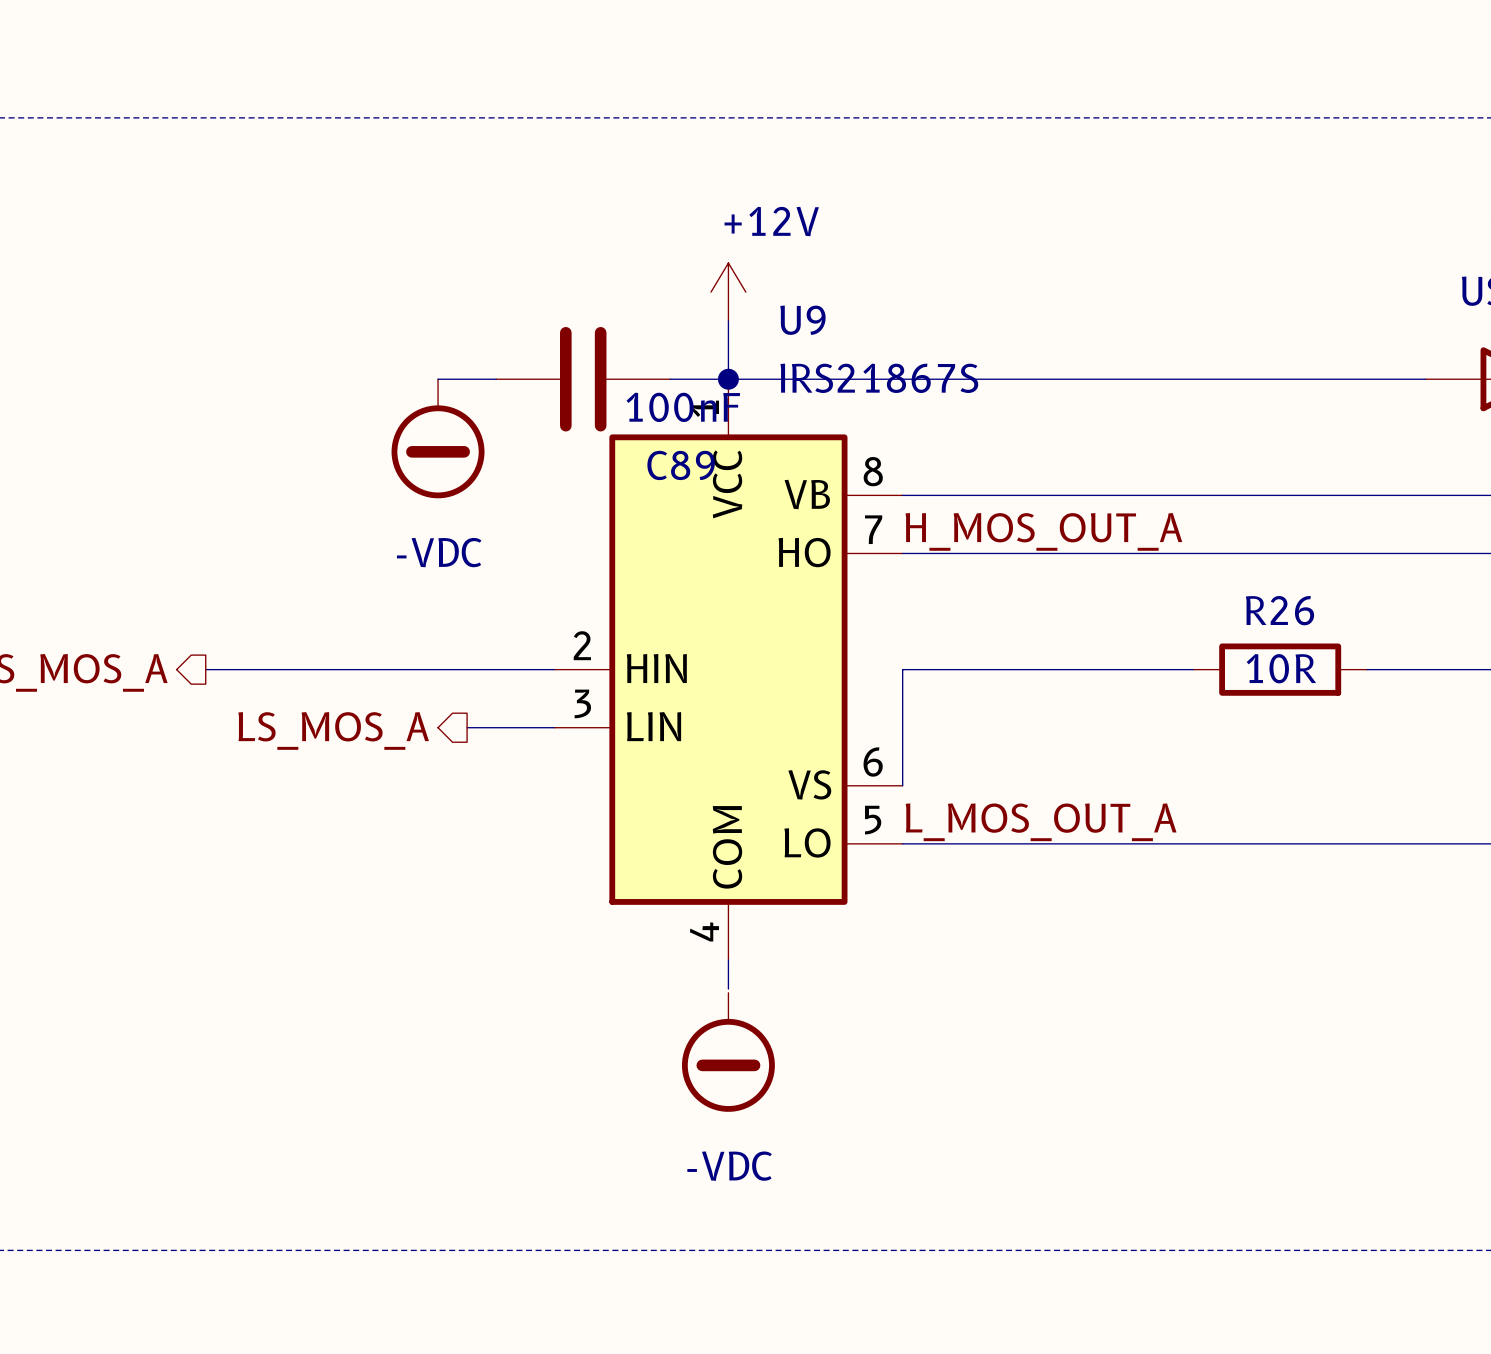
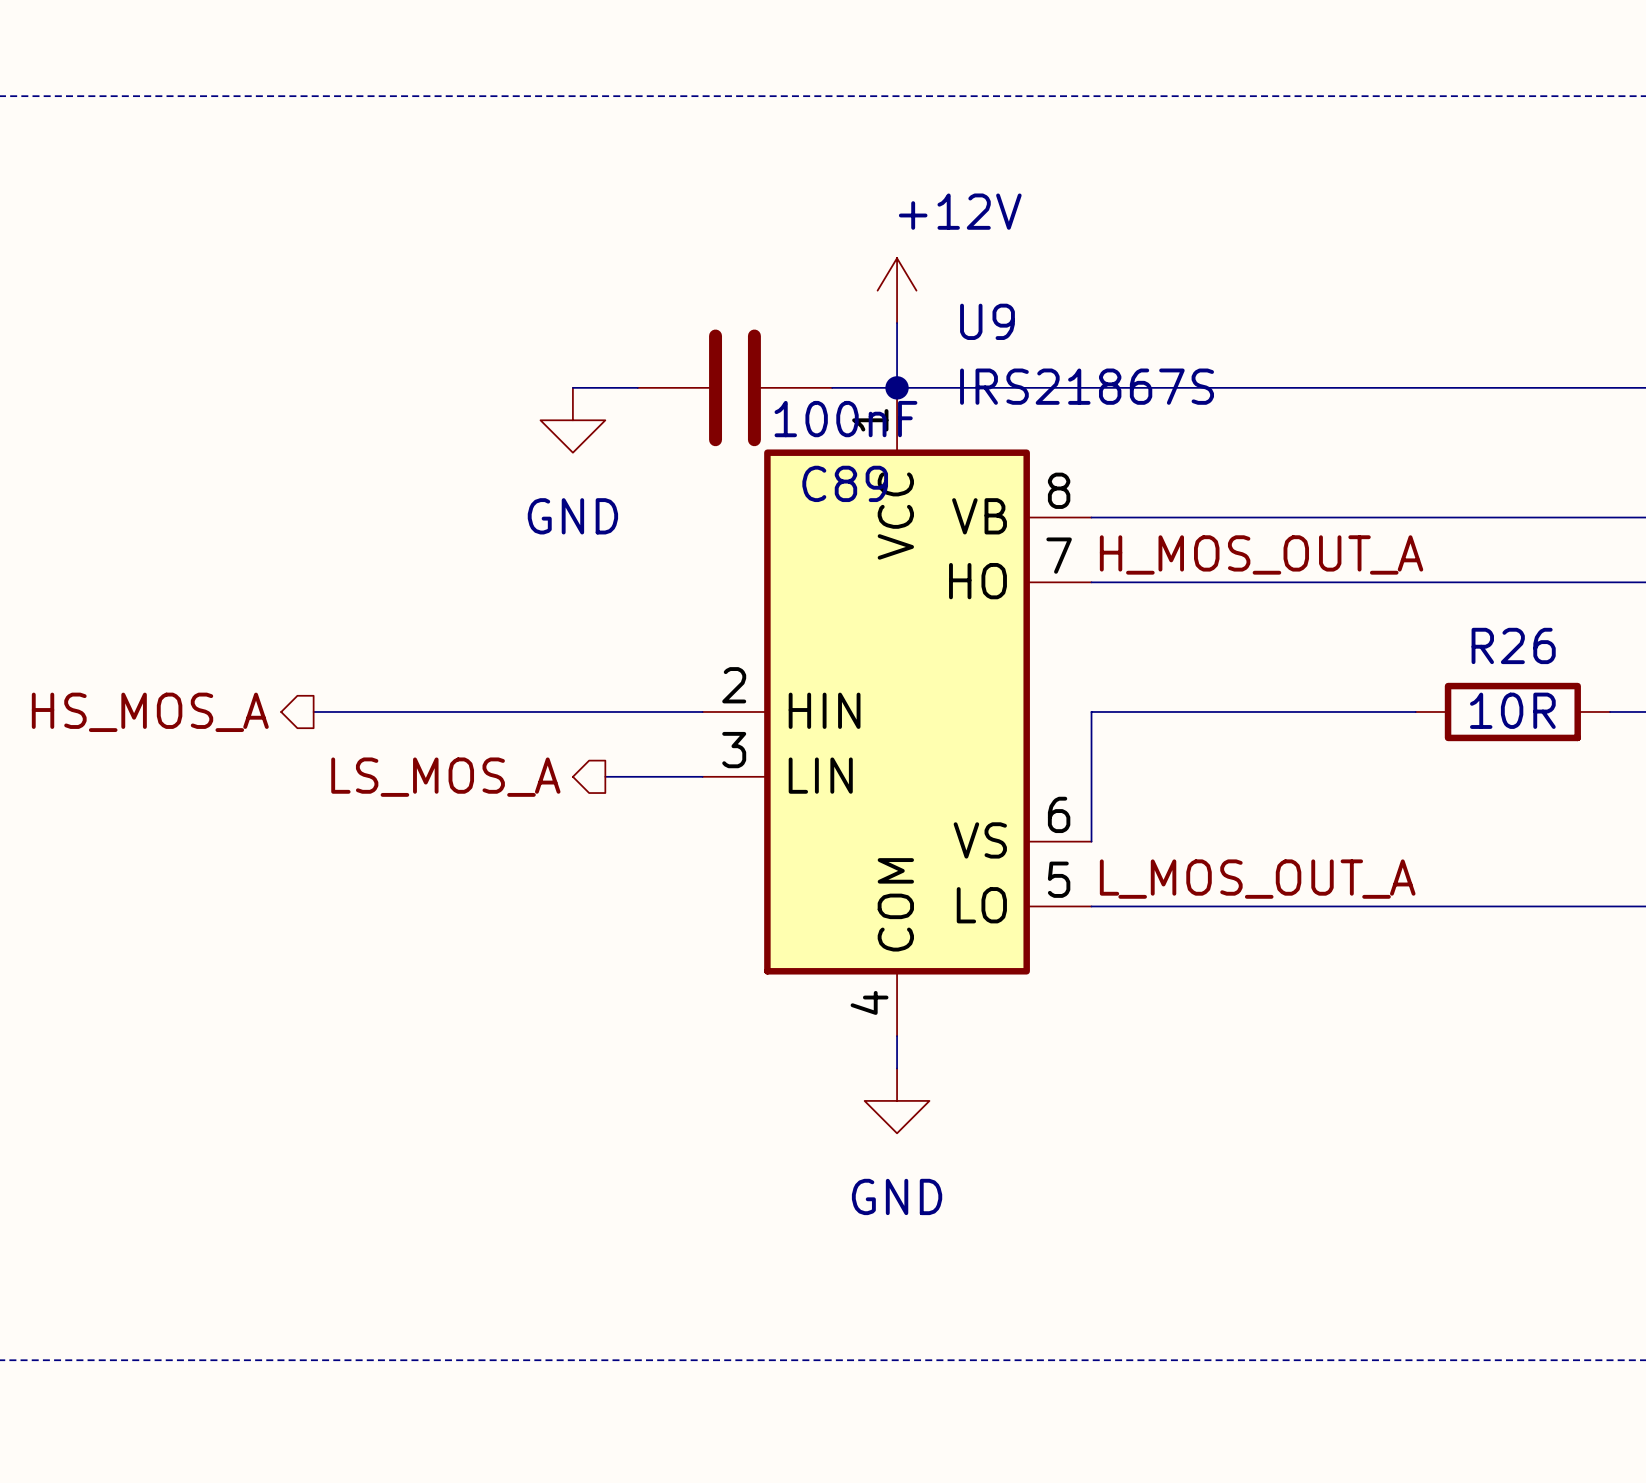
power symbol: none -> GND (572, 420)
power symbol: -VDC (438, 438) -> none
power symbol: none -> GND (897, 1100)
power symbol: -VDC (728, 1052) -> none

